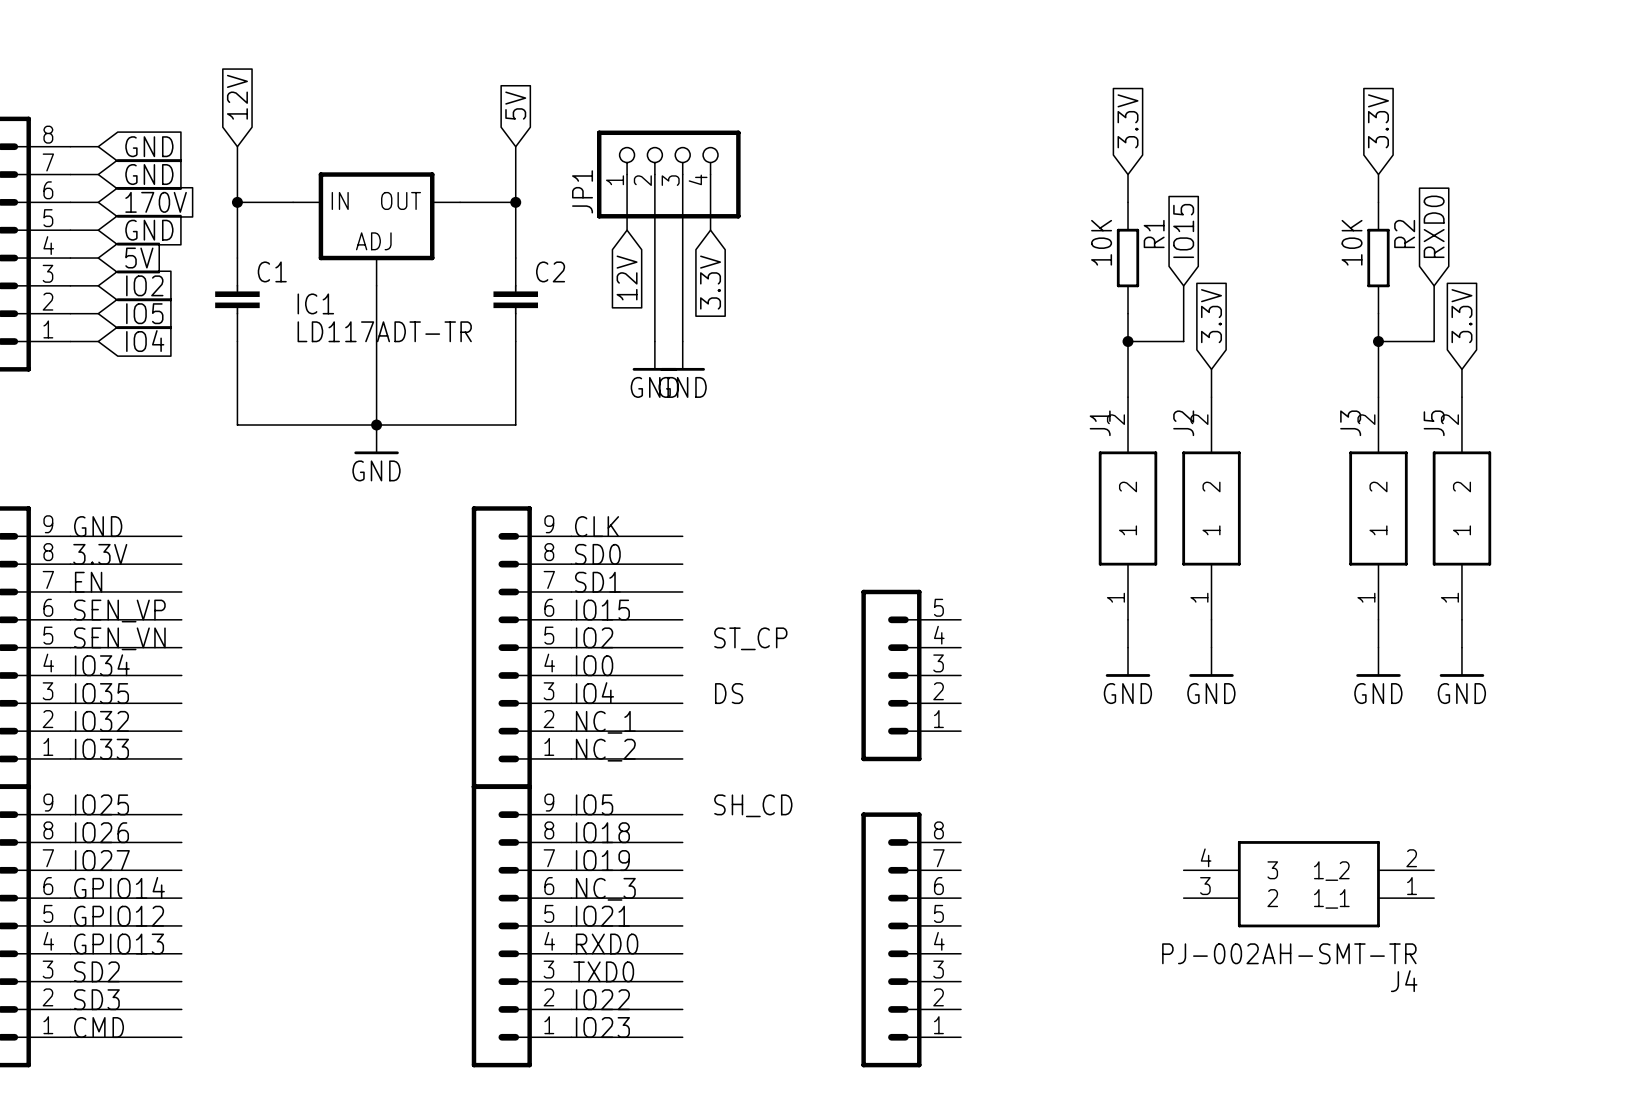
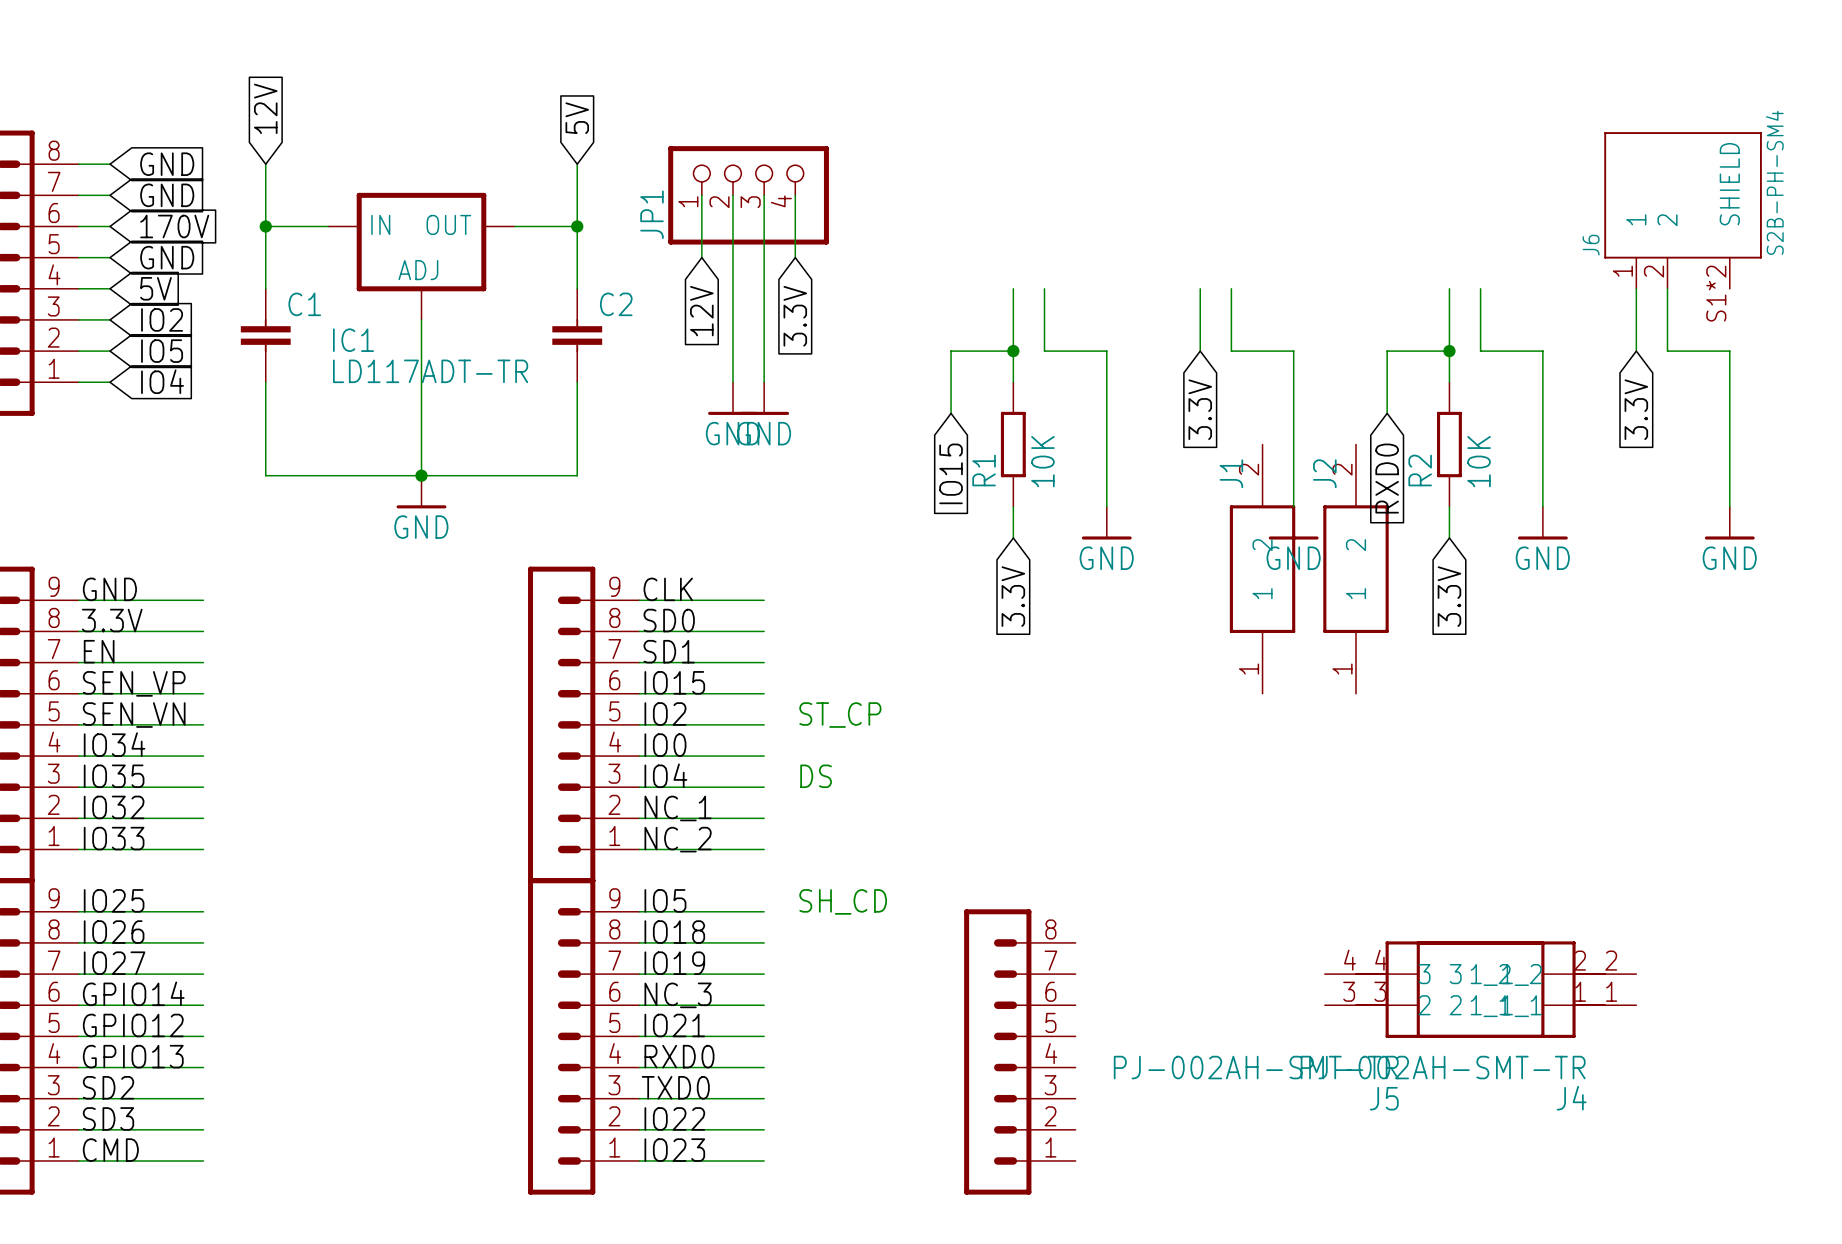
global label: 3.3V (1128, 121) -> none
global label: 3.3V (1378, 121) -> none
wire: (1128, 174) (1128, 202) -> none
wire: (1378, 174) (1378, 202) -> none
J6: none -> S2B-PH-SM4 (1683, 210)
global label rotation: 0° (1434, 226) -> 180° (1387, 478)
global label position: RXD0 (1434, 226) -> RXD0 (1387, 478)
global label: IO15 (1183, 230) -> none
R1 name position: R1 (1154, 234) -> R1 (984, 470)
R2 name position: R2 (1404, 234) -> R2 (1420, 470)
R1 value position: 10K (1101, 242) -> 10K (1042, 461)
R2 value position: 10K (1352, 242) -> 10K (1479, 461)
wire: none -> (1013, 288) (1013, 382)
wire: none -> (1044, 288) (1044, 351) (1106, 351) (1106, 506)
wire: none -> (1200, 288) (1200, 351)
wire: none -> (1231, 288) (1231, 351) (1293, 351) (1293, 506)
R1 position: (1128, 258) -> (1013, 444)
wire: none -> (1480, 288) (1480, 351) (1542, 351)
R2 position: (1378, 258) -> (1449, 444)
wire: none -> (1636, 288) (1636, 351)
wire: none -> (1667, 288) (1667, 351) (1729, 351) (1729, 506)
wire: (1183, 285) (1183, 341) (1128, 341) -> none
wire: (1434, 285) (1434, 341) (1378, 341) -> none
wire: none -> (1013, 351) (951, 351) (951, 413)
junction: none -> (1013, 351)
wire: (1128, 313) (1128, 397) -> (1449, 288) (1449, 382)
wire: none -> (1449, 351) (1387, 351) (1387, 413)
junction: none -> (1449, 351)
global label: 3.3V (1211, 316) -> none
global label rotation: 0° (1461, 316) -> 180° (1636, 409)
junction: (1128, 341) -> none
junction: (1378, 341) -> none
global label: none -> 3.3V (1200, 409)
wire: (1211, 369) (1211, 397) -> (1449, 506) (1449, 537)
wire: (1461, 369) (1461, 397) -> none
J5 symbol: [1432, 397, 1492, 620] -> [1355, 941, 1637, 1038]
global label: none -> IO15 (951, 473)
J5 name position: J5 (1434, 423) -> J5 (1384, 1098)
wire: none -> (1013, 506) (1013, 537)
power symbol: none -> GND (1106, 523)
power symbol: none -> GND (1293, 523)
power symbol: none -> GND (1542, 523)
power symbol: none -> GND (1729, 523)
J3: (1378, 508) -> none
global label: none -> 3.3V (1013, 596)
global label: none -> 3.3V (1449, 596)
wire: (1128, 619) (1128, 647) -> none
wire: (1211, 619) (1211, 647) -> none
wire: (1378, 619) (1378, 647) -> none
wire: (1461, 619) (1461, 647) -> none
power symbol: GND (1128, 662) -> none
power symbol: GND (1211, 662) -> none
power symbol: GND (1378, 662) -> none
power symbol: GND (1461, 662) -> none
part: (911, 675) -> none
J5 value: none -> PJ-002AH-SMT-TR (1256, 1067)

